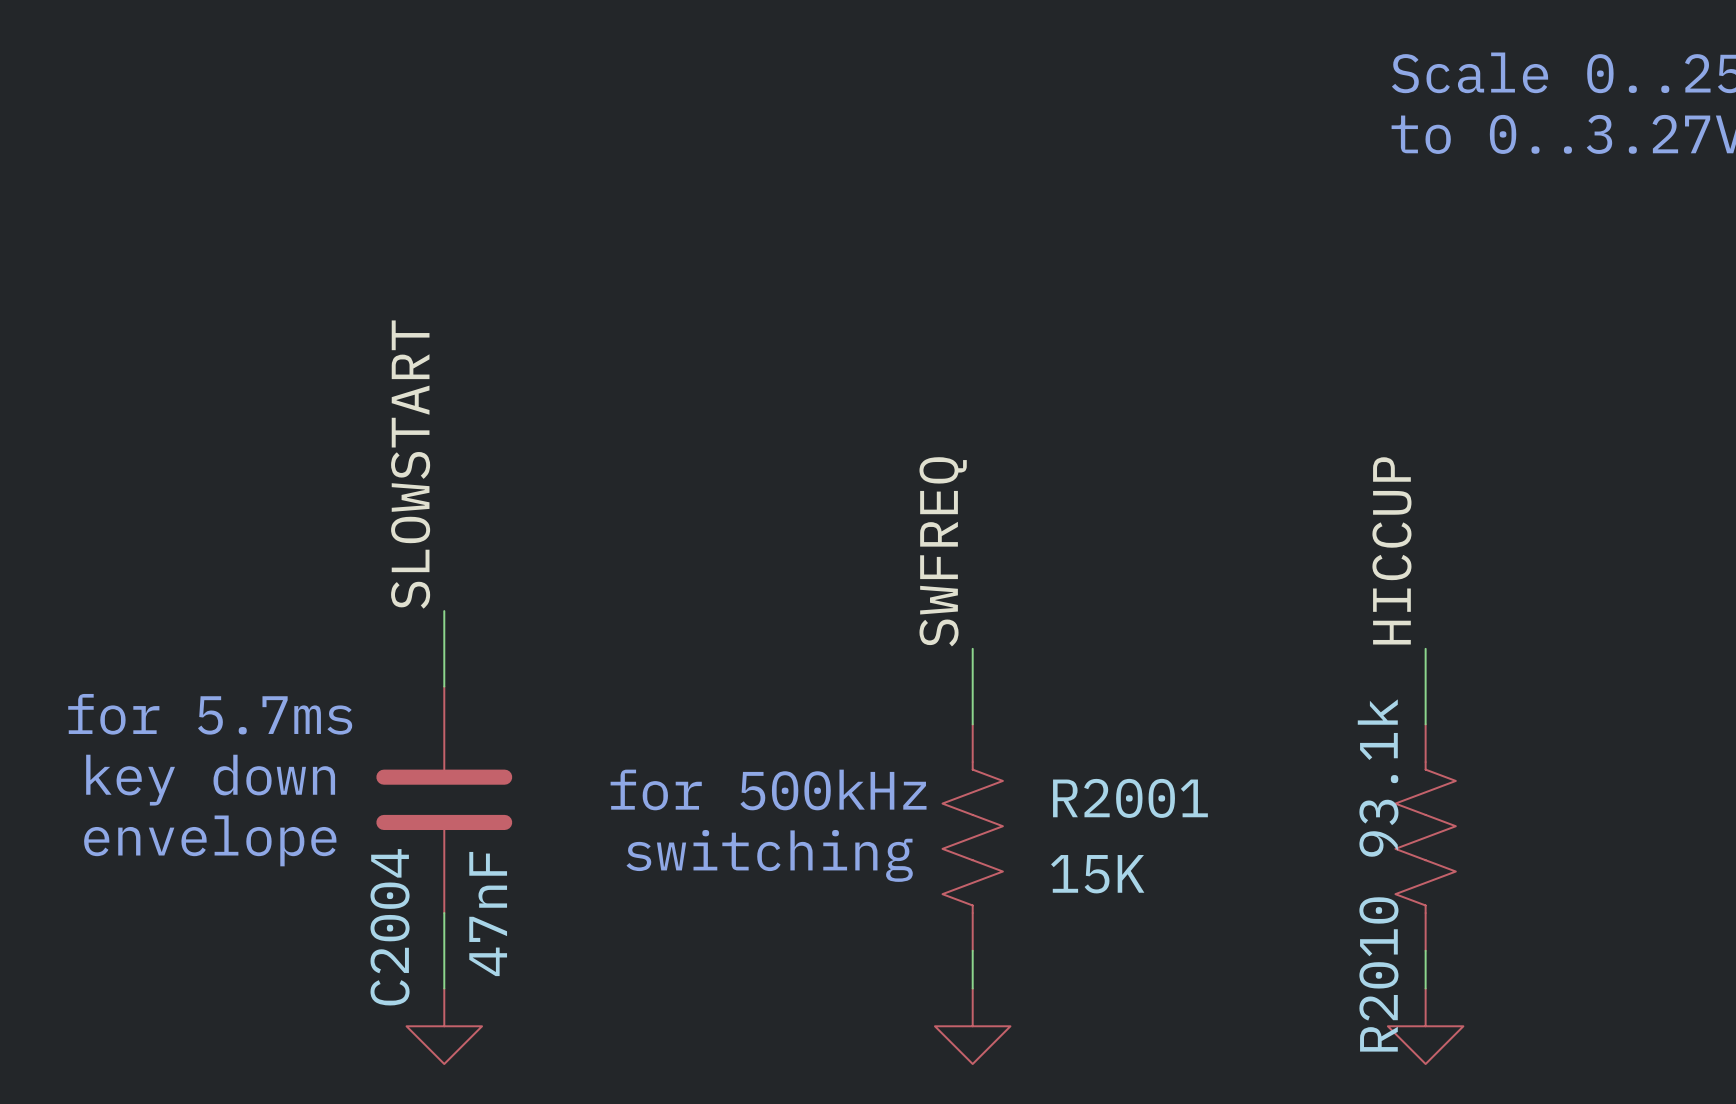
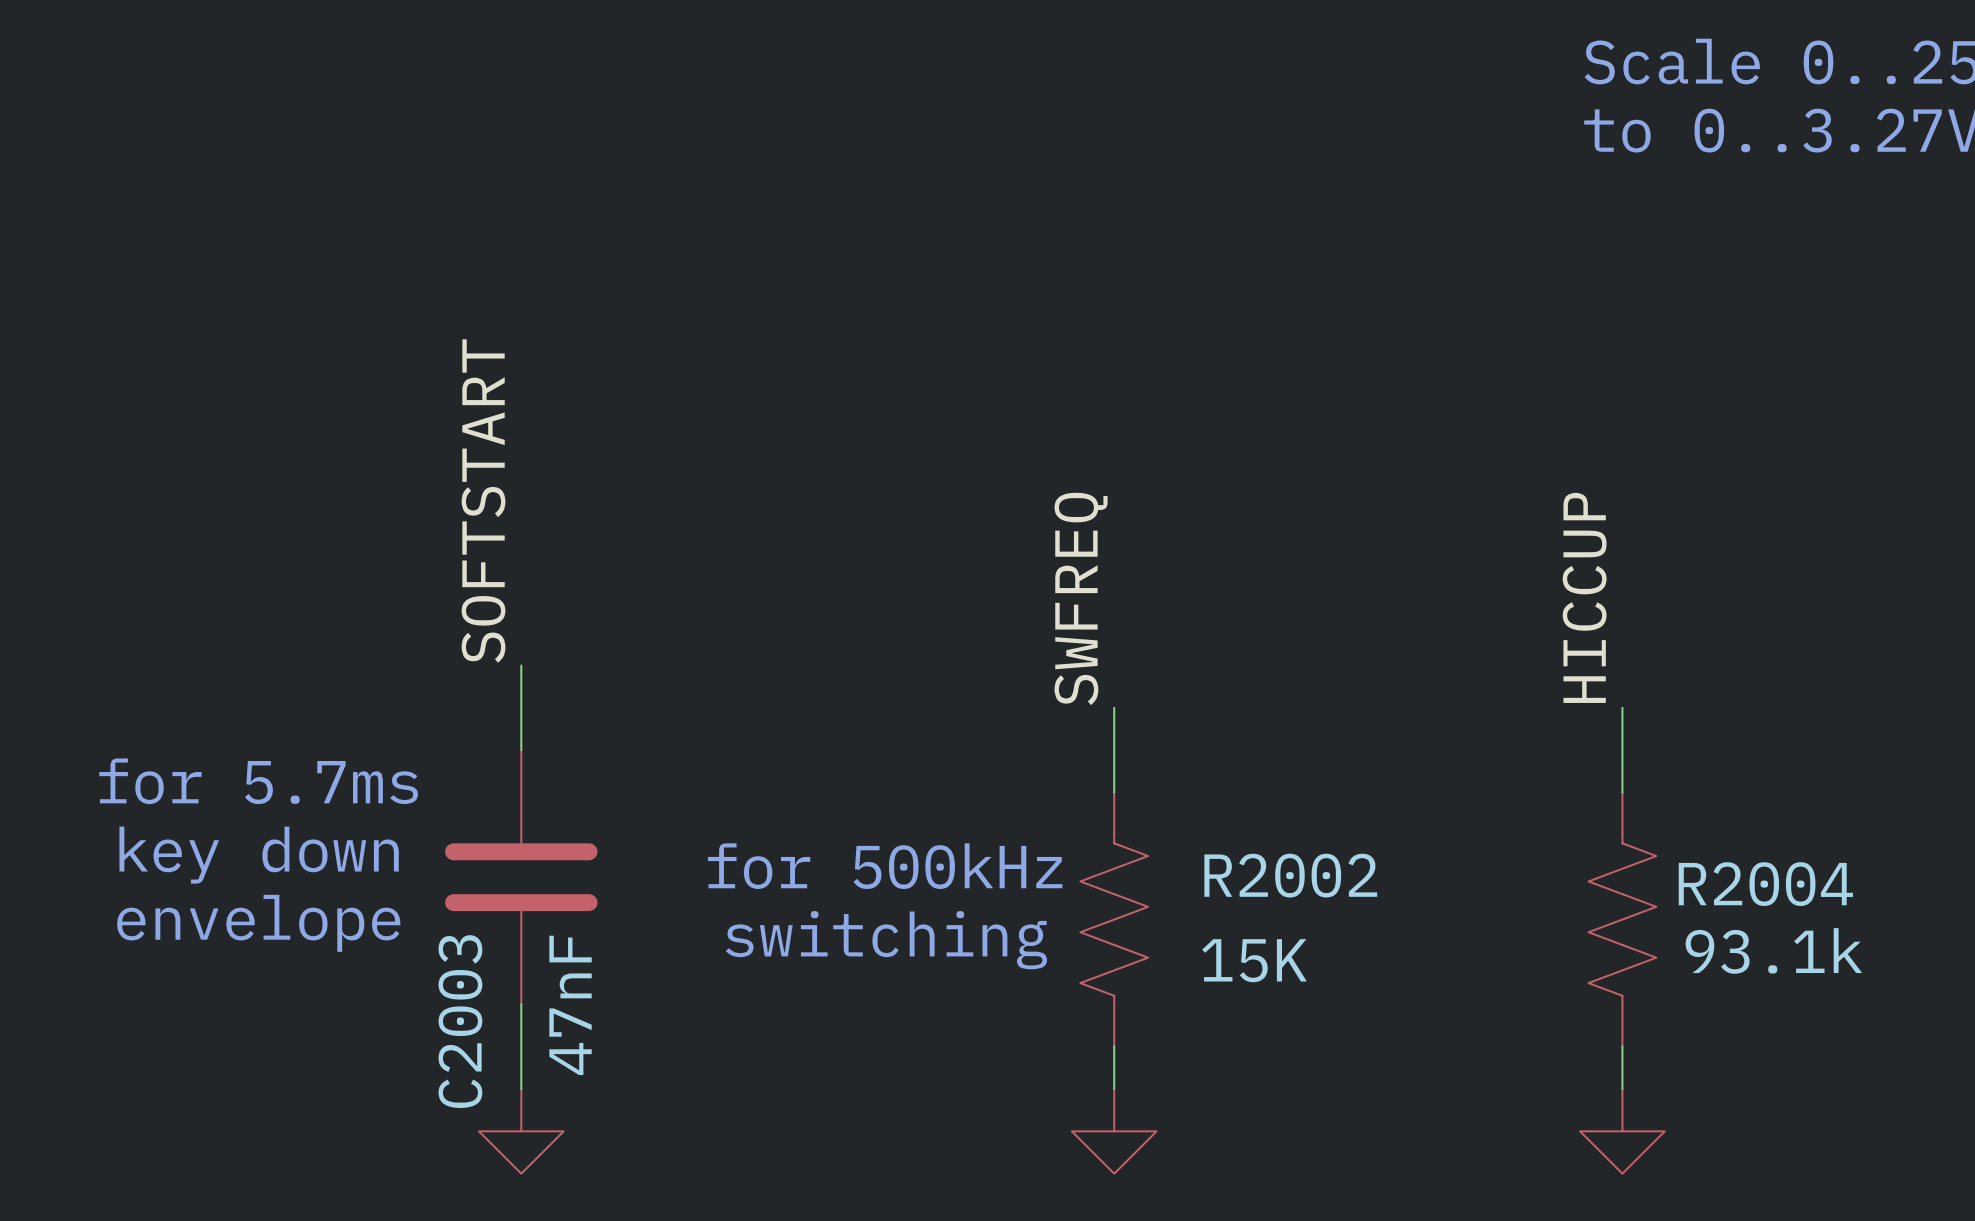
label: SLOWSTART (410, 464) -> SOFTSTART (483, 501)
R2010 value rotation: 0° (1378, 778) -> 90° clockwise (1773, 950)
R2010 value position: 93.1k (1378, 778) -> 93.1k (1773, 950)
R2001 name: R2001 (1130, 798) -> R2002 (1290, 875)
C2004 name: C2004 (390, 927) -> C2003 (460, 1021)
R2010 name: R2010 (1378, 974) -> R2004 (1765, 884)

